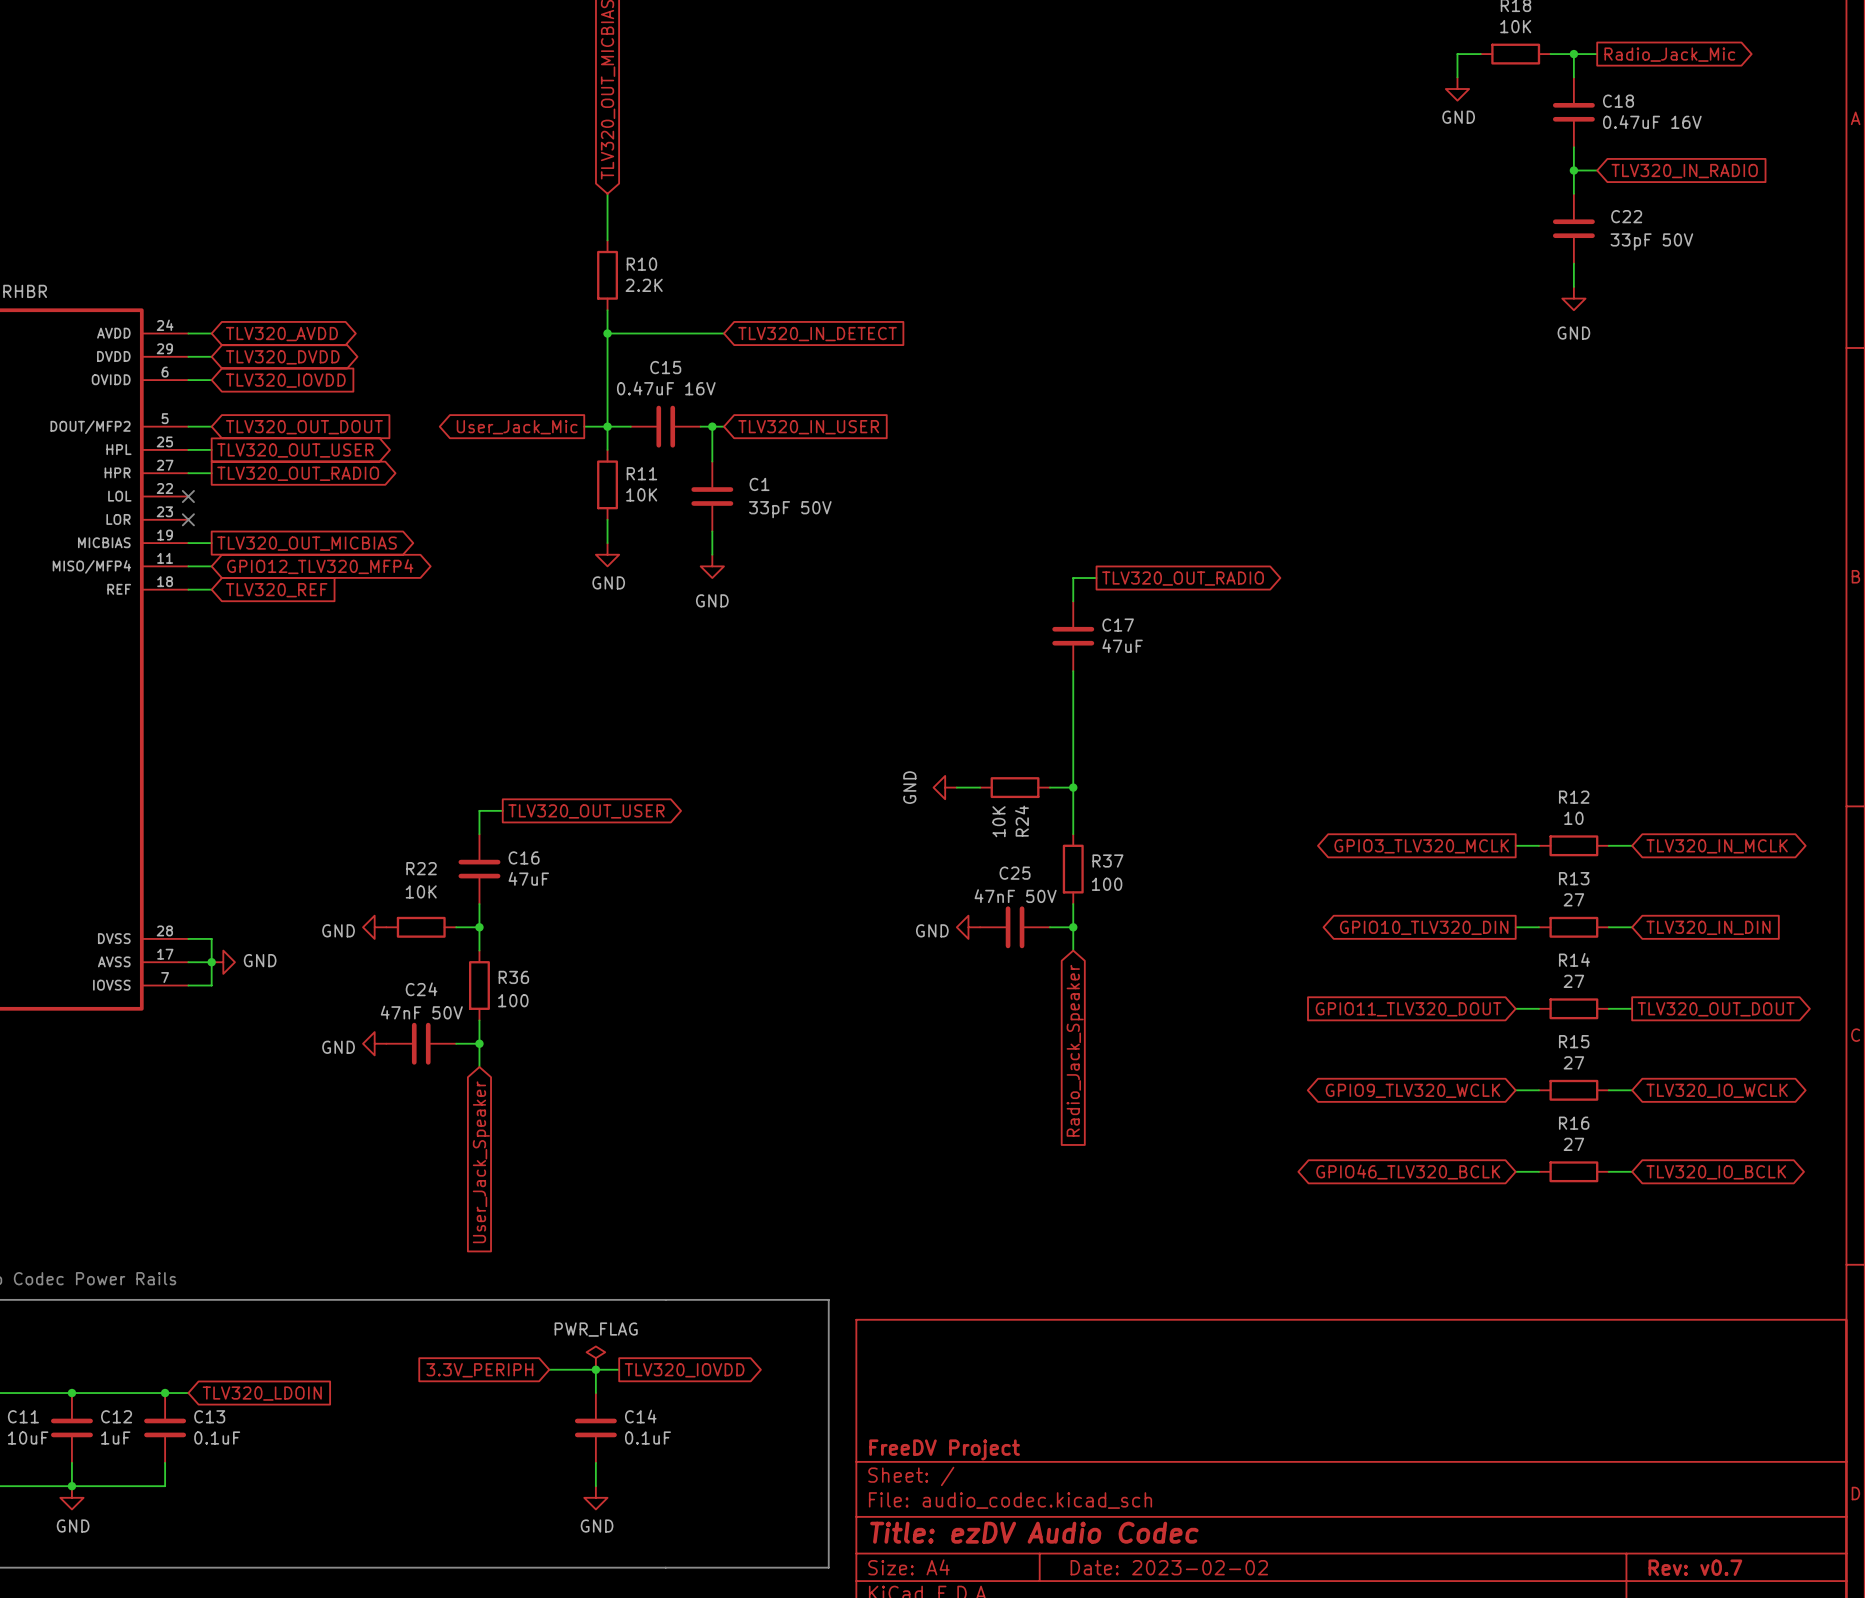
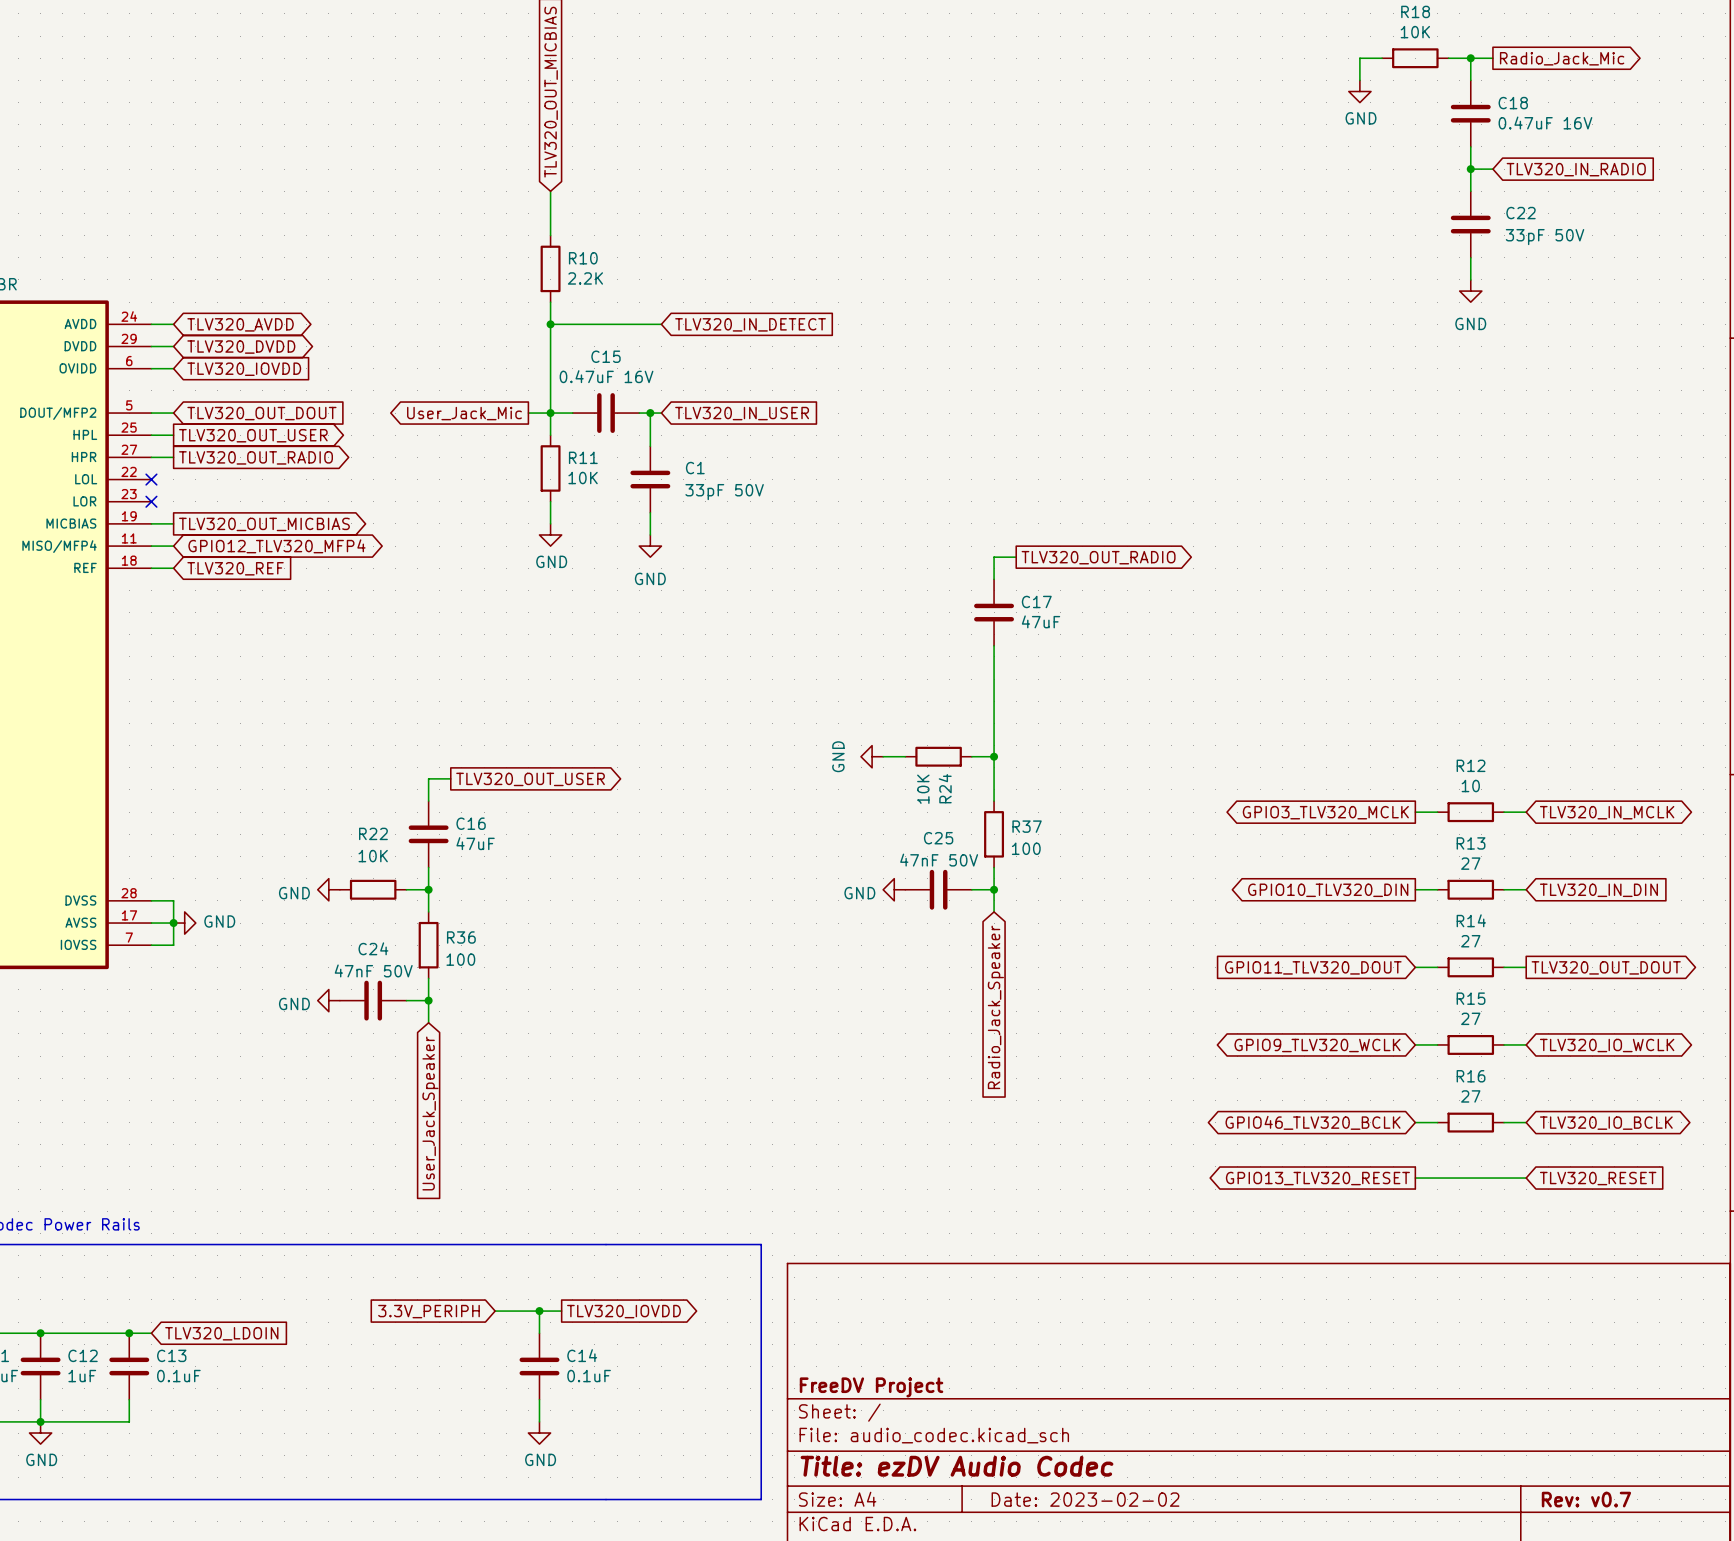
global label: none -> GPIO13_TLV320_RESET (1317, 1178)
wire: none -> (1415, 1178) (1526, 1178)
global label: none -> TLV320_RESET (1598, 1178)
power symbol: PWR_FLAG (595, 1358) -> none

